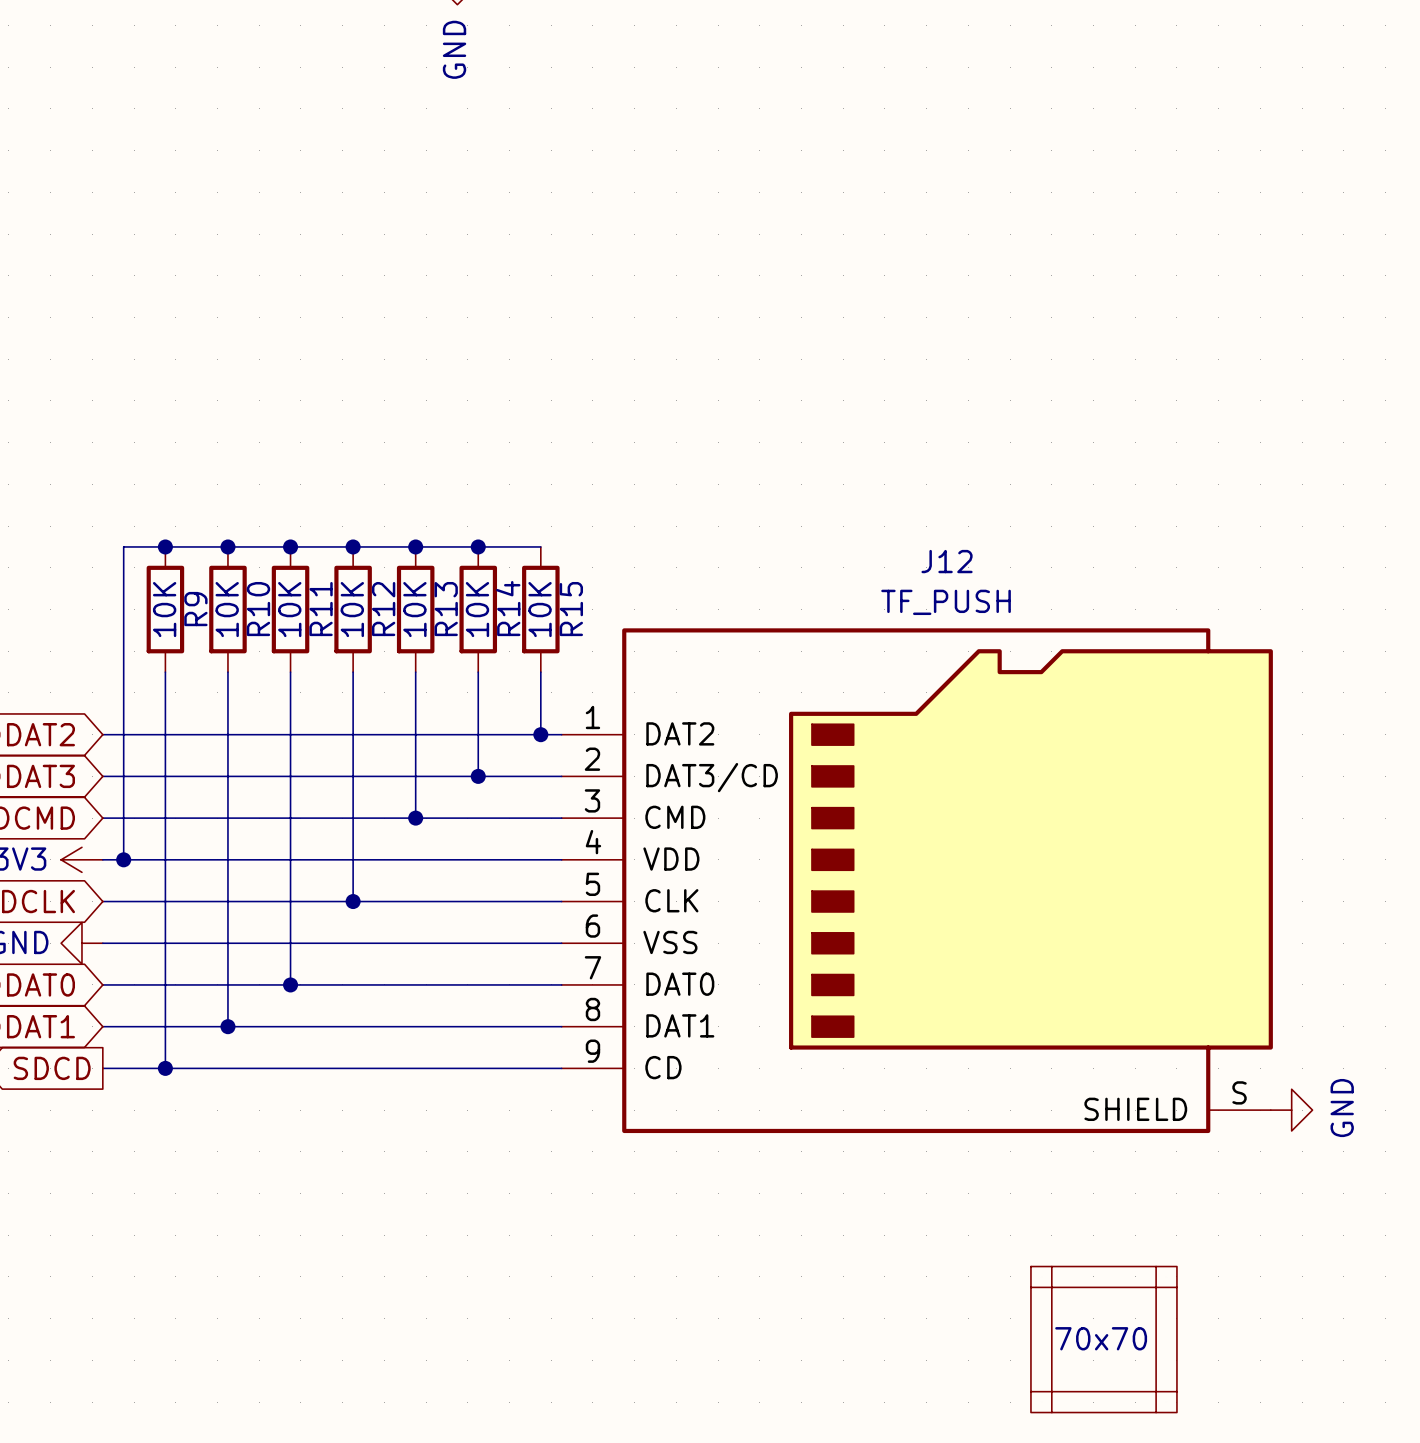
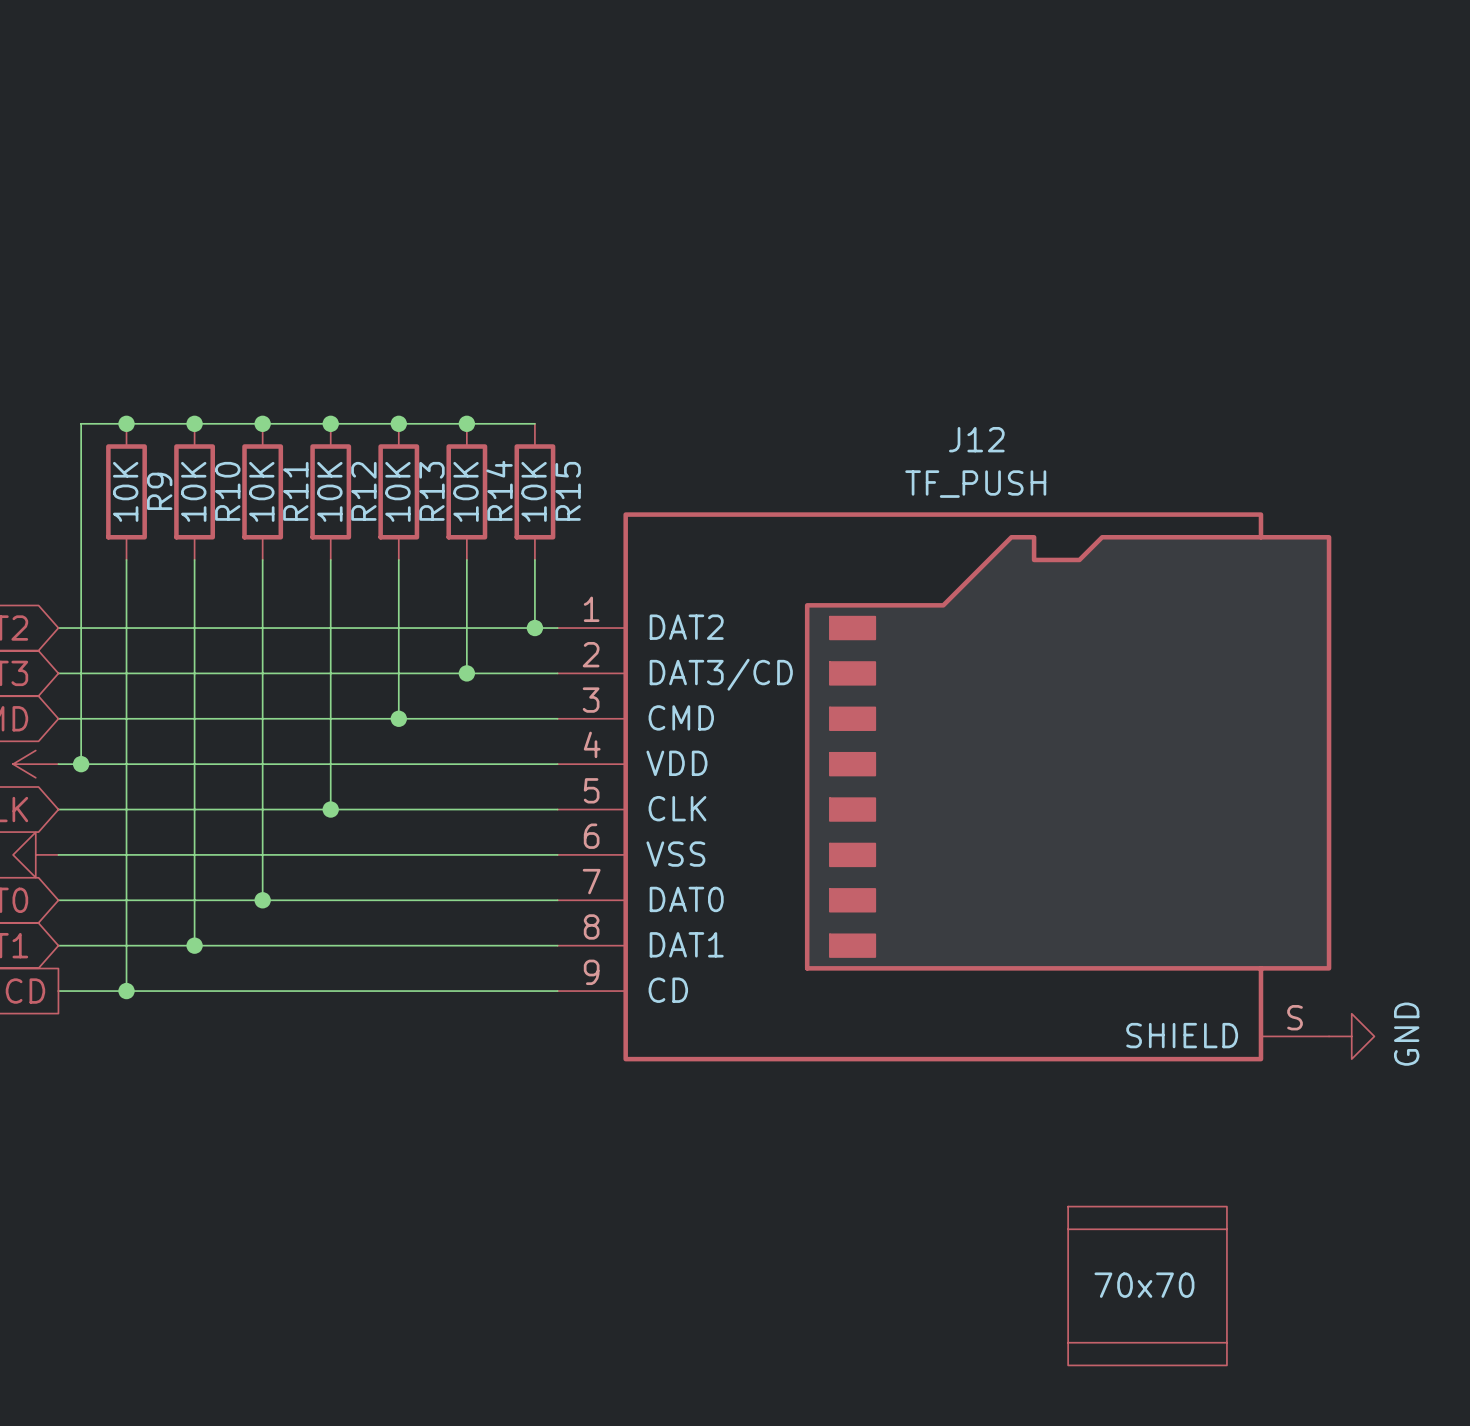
part: (1051, 1339) -> none
part: (1156, 1339) -> none

